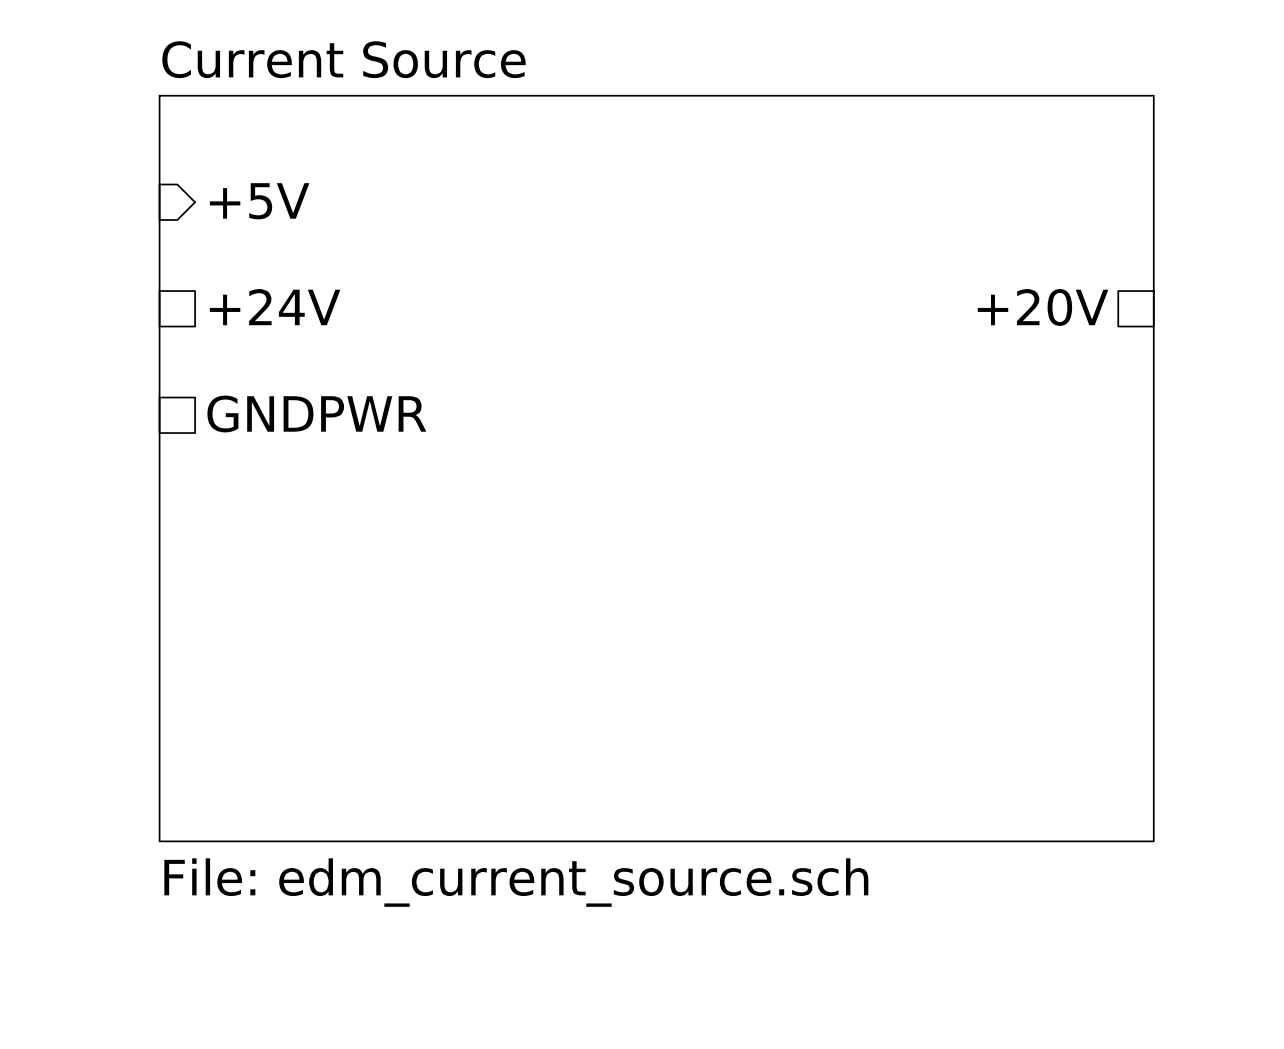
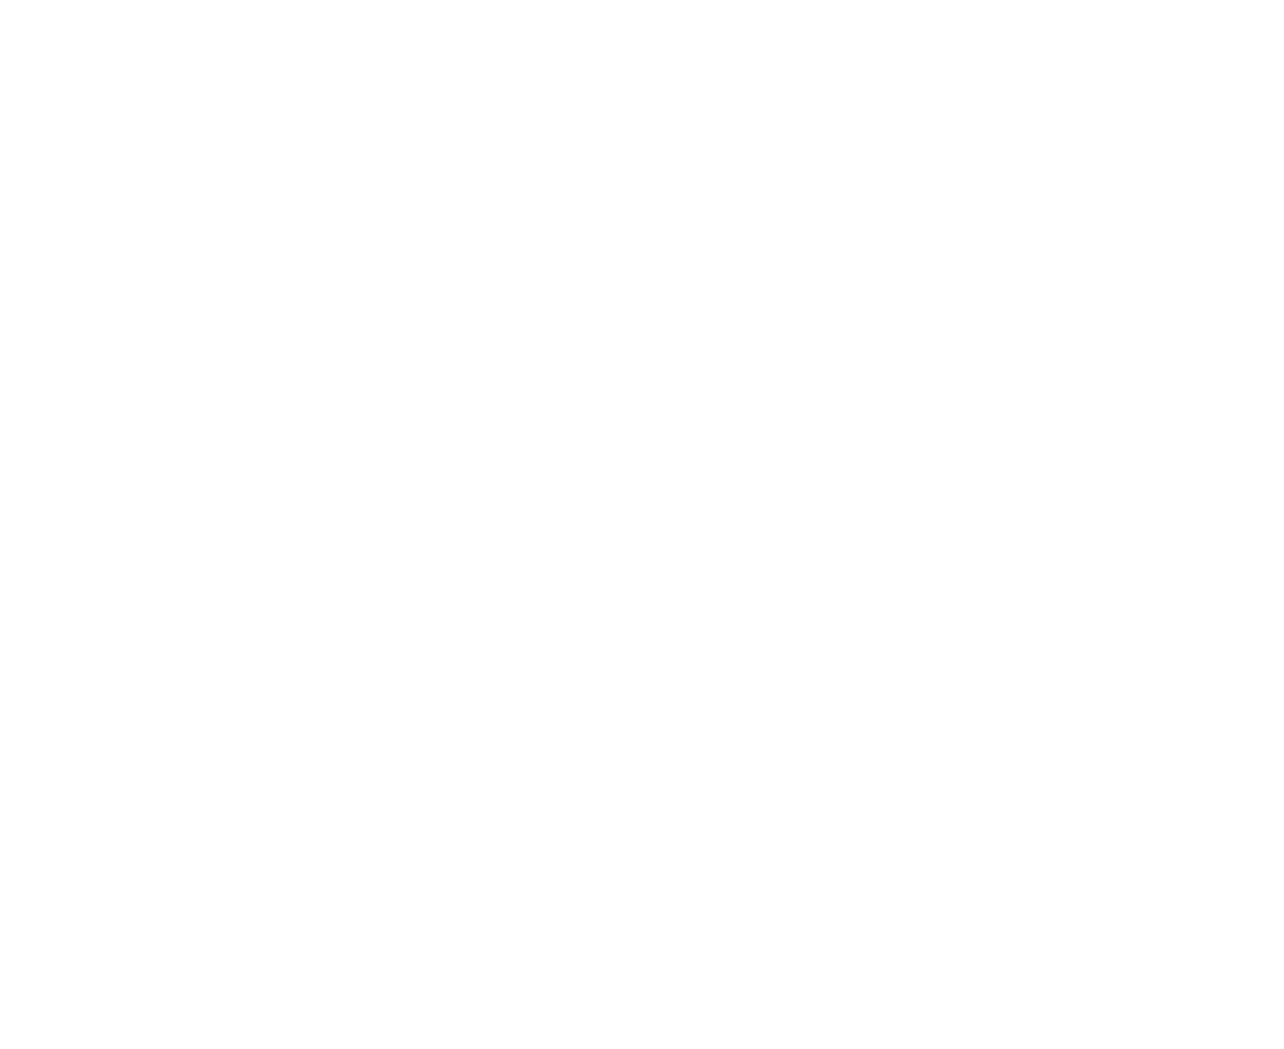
sheet pin: +5V (259, 201) -> none
sheet pin: +24V (275, 307) -> none
sheet pin: +20V (1043, 307) -> none
sheet pin: GNDPWR (316, 413) -> none
sheet Current Source: File: edm_current_source.sch (656, 468) -> none

